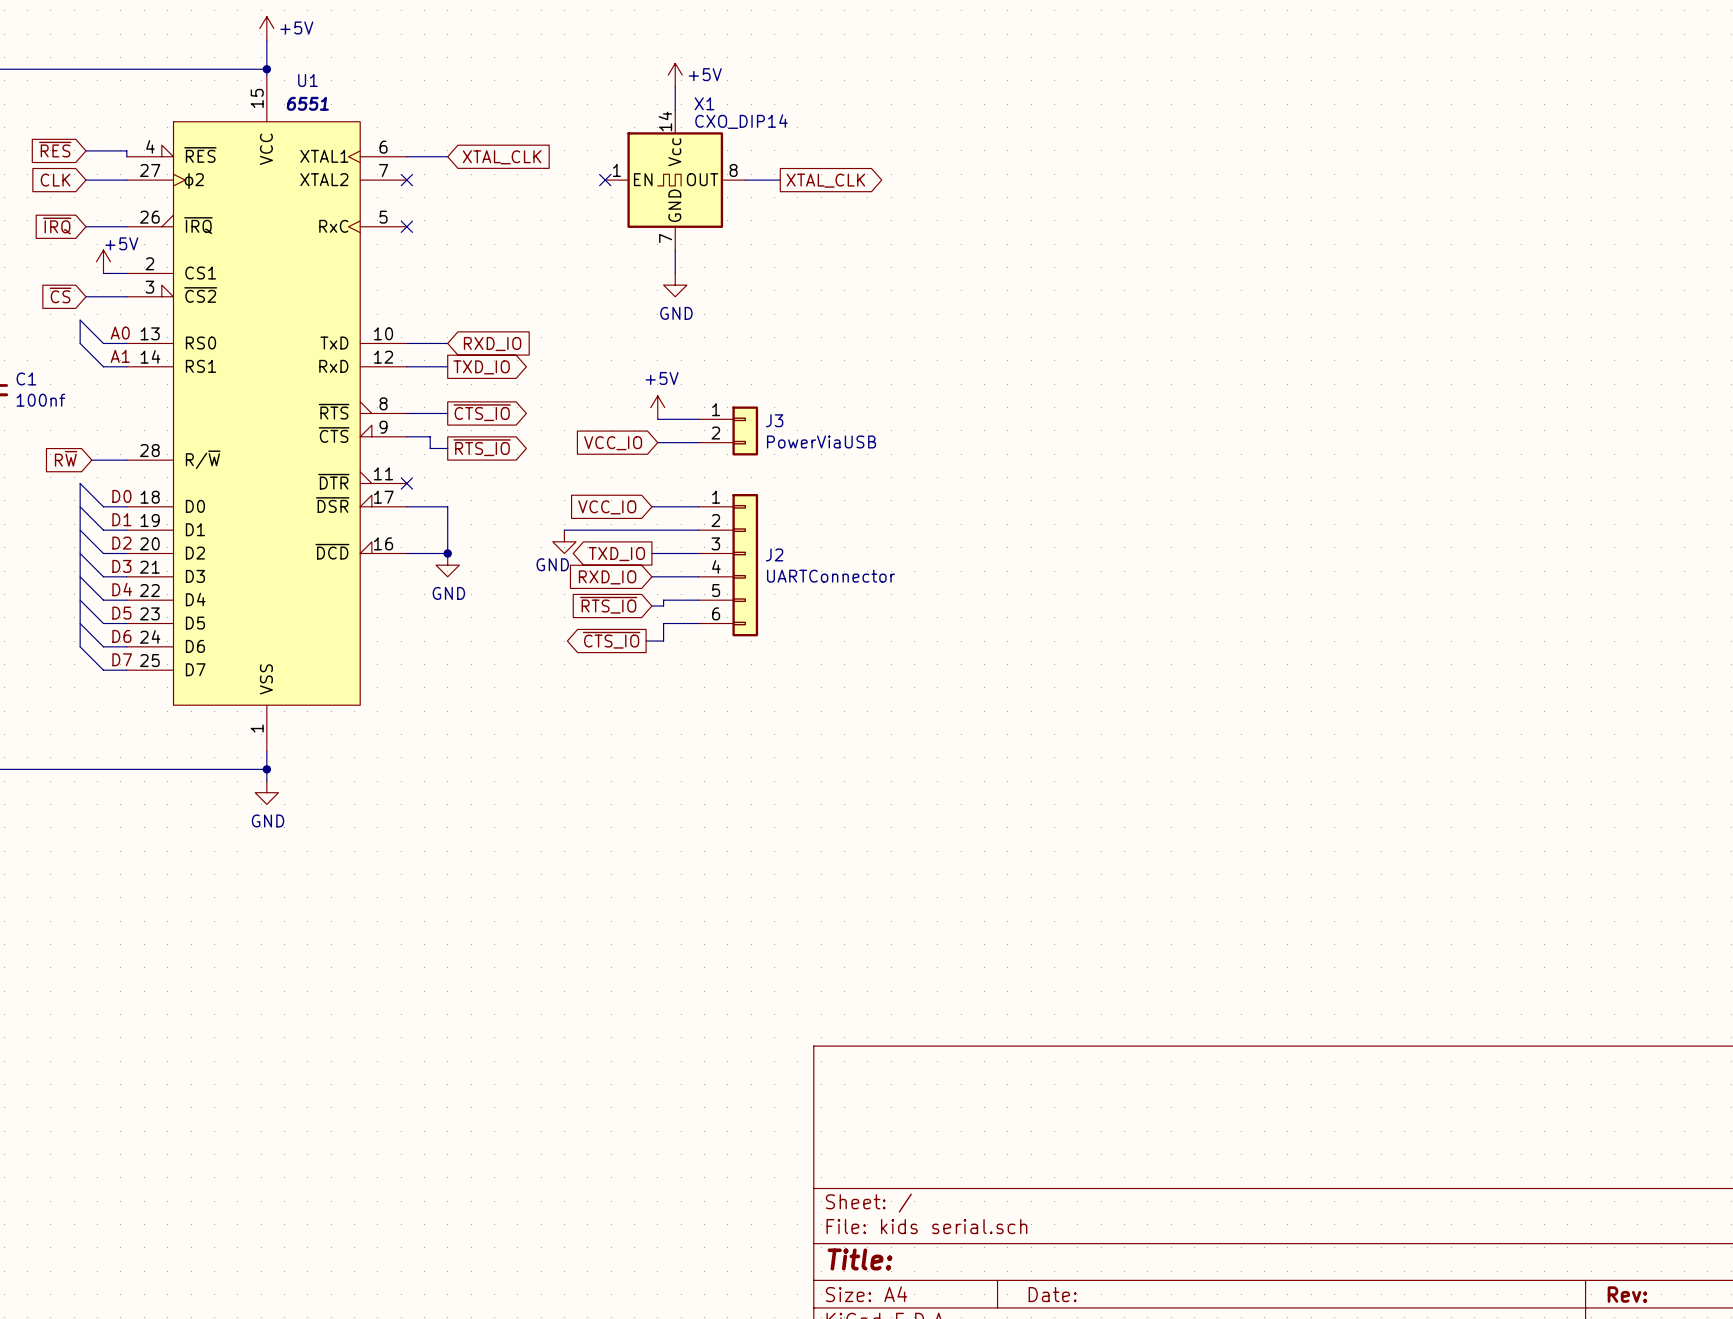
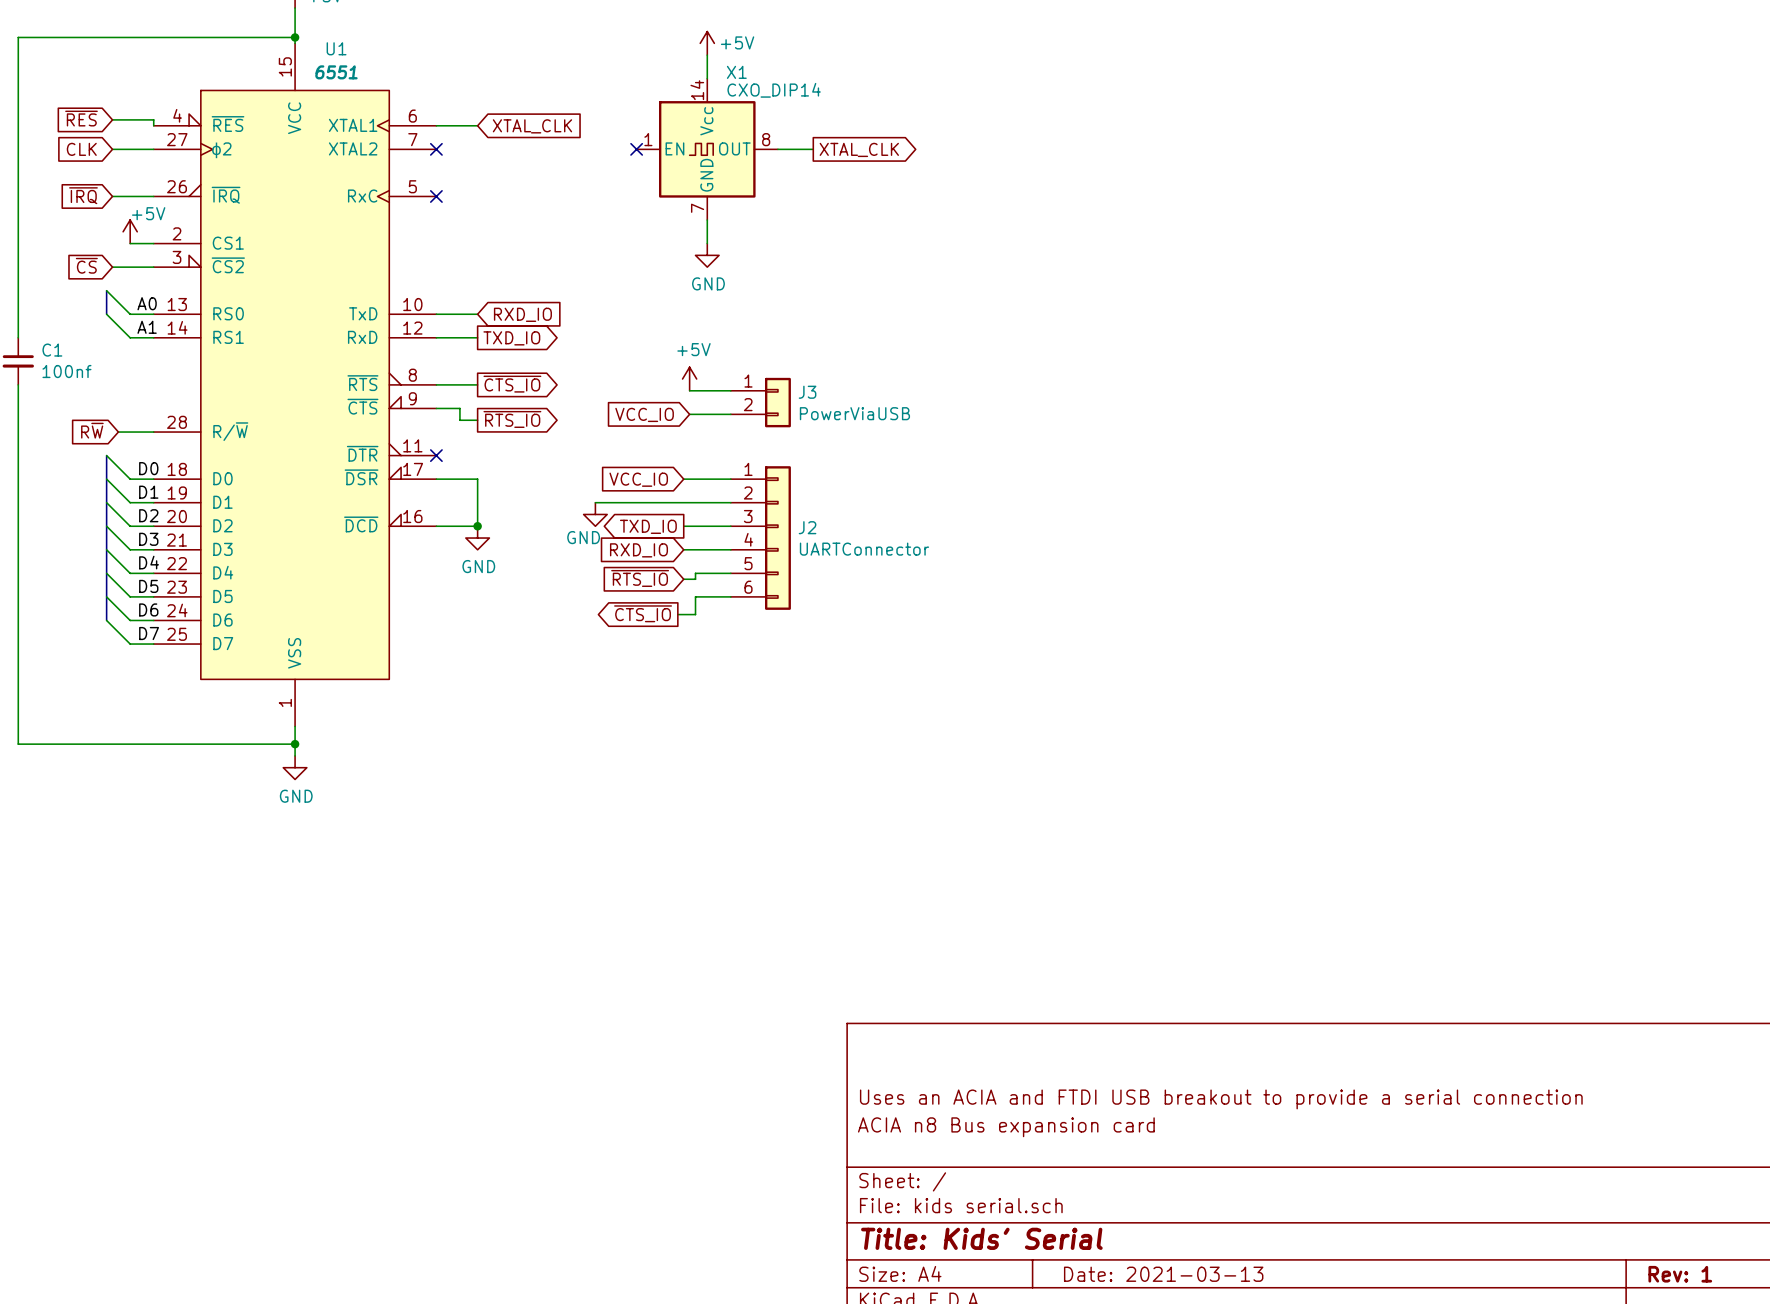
title block: none -> Uses an ACIA and FTDI USB breakout to provide a serial connection (1221, 1099)
title block: none -> ACIA n8 Bus expansion card (1006, 1127)
title block: Title: (860, 1259) -> Title: Kids' Serial (981, 1238)
title block: Date: (1052, 1294) -> Date: 2021-03-13 (1163, 1274)
title block: Rev: (1627, 1294) -> Rev: 1 (1680, 1274)

